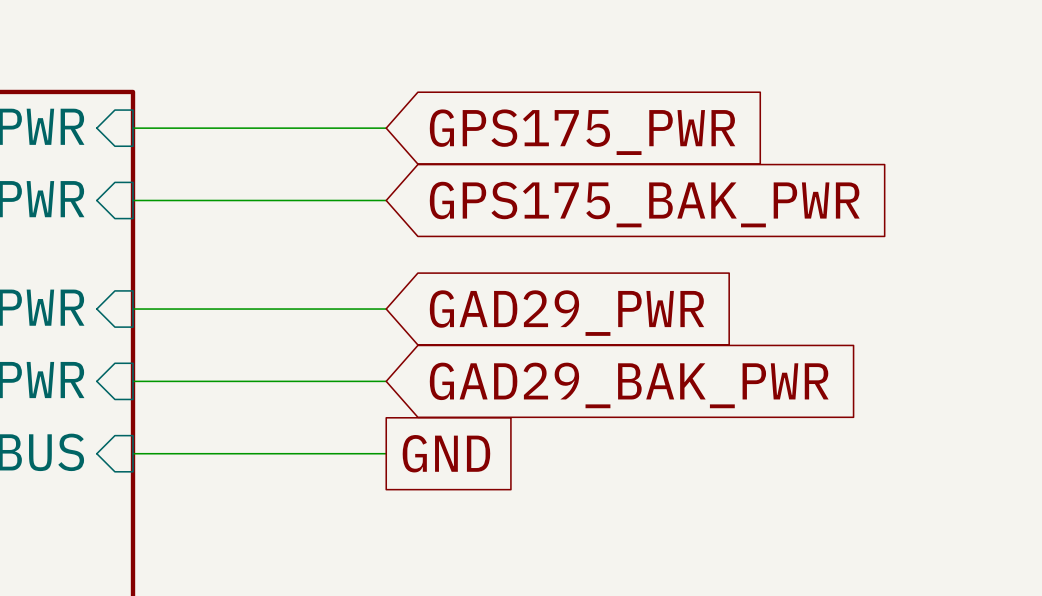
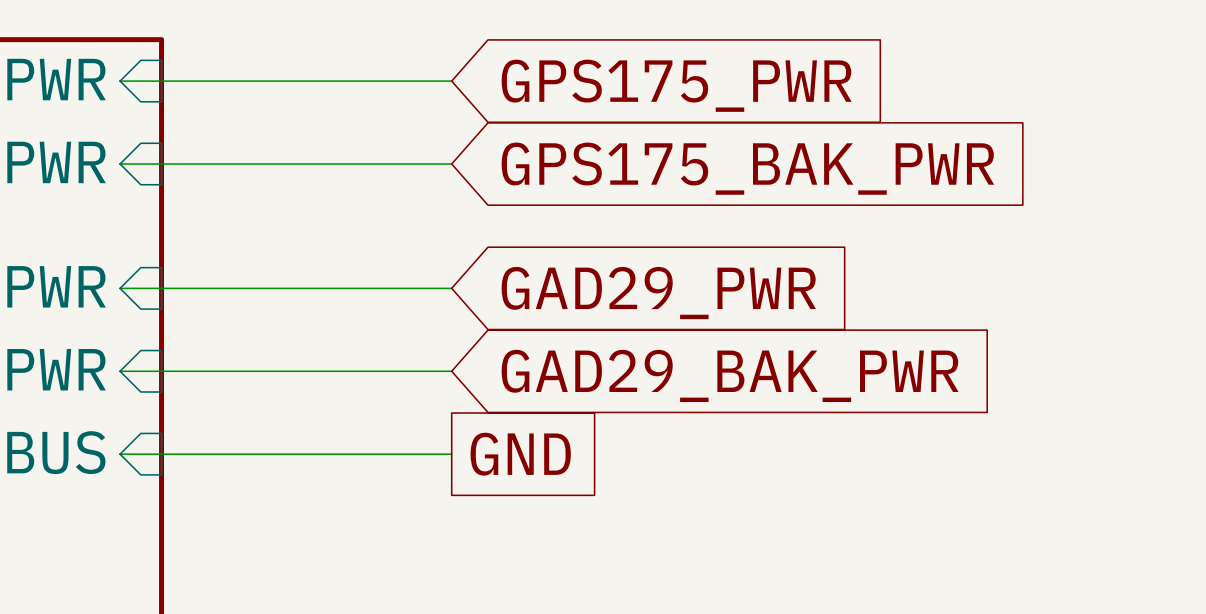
wire: none -> (120, 81) (161, 81)
wire: none -> (120, 164) (161, 164)
wire: none -> (120, 288) (161, 288)
wire: none -> (120, 371) (161, 371)
wire: none -> (120, 454) (161, 454)

